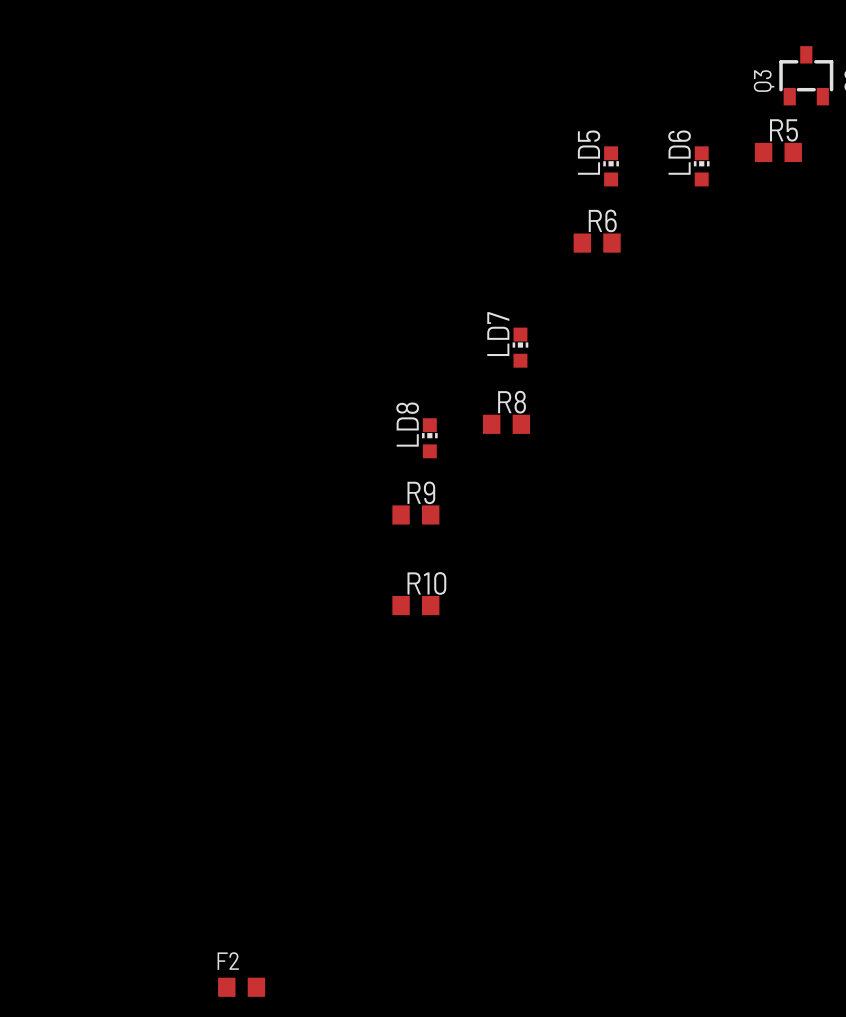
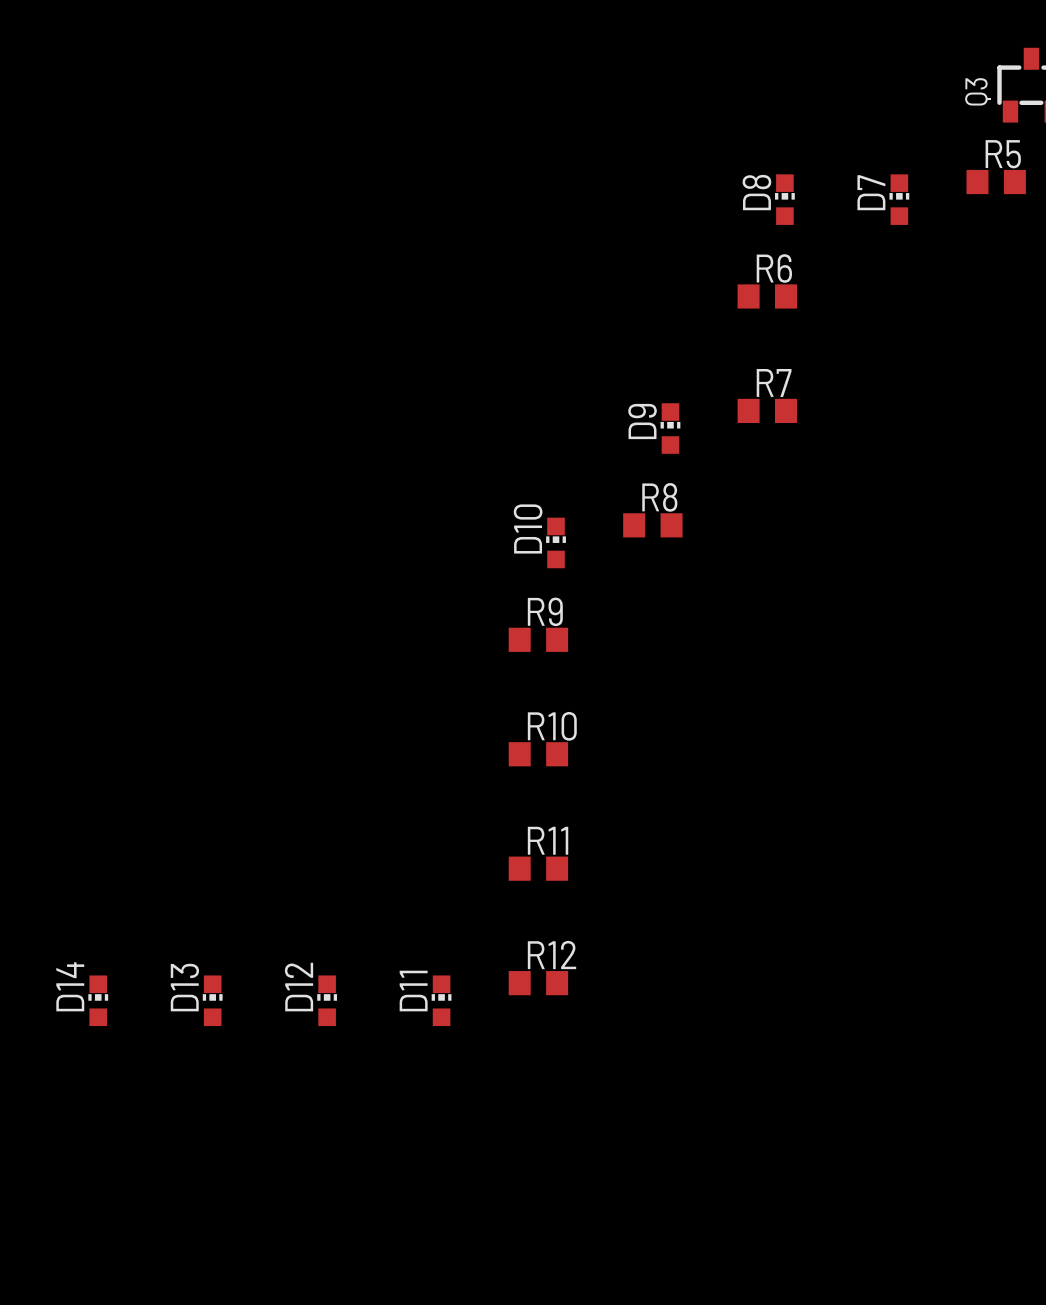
LD5 name: LD5 (589, 152) -> D8 (756, 192)
LD6 name: LD6 (679, 152) -> D7 (871, 192)
R7: none -> (767, 410)
LD7 name: LD7 (498, 334) -> D9 (642, 421)
LD8 name: LD8 (407, 424) -> D10 (528, 528)
R11: none -> (538, 868)
R12: none -> (538, 983)
D14: none -> (98, 1000)
D13: none -> (212, 1000)
D12: none -> (327, 1000)
D11: none -> (441, 1000)
F2: (241, 987) -> none

